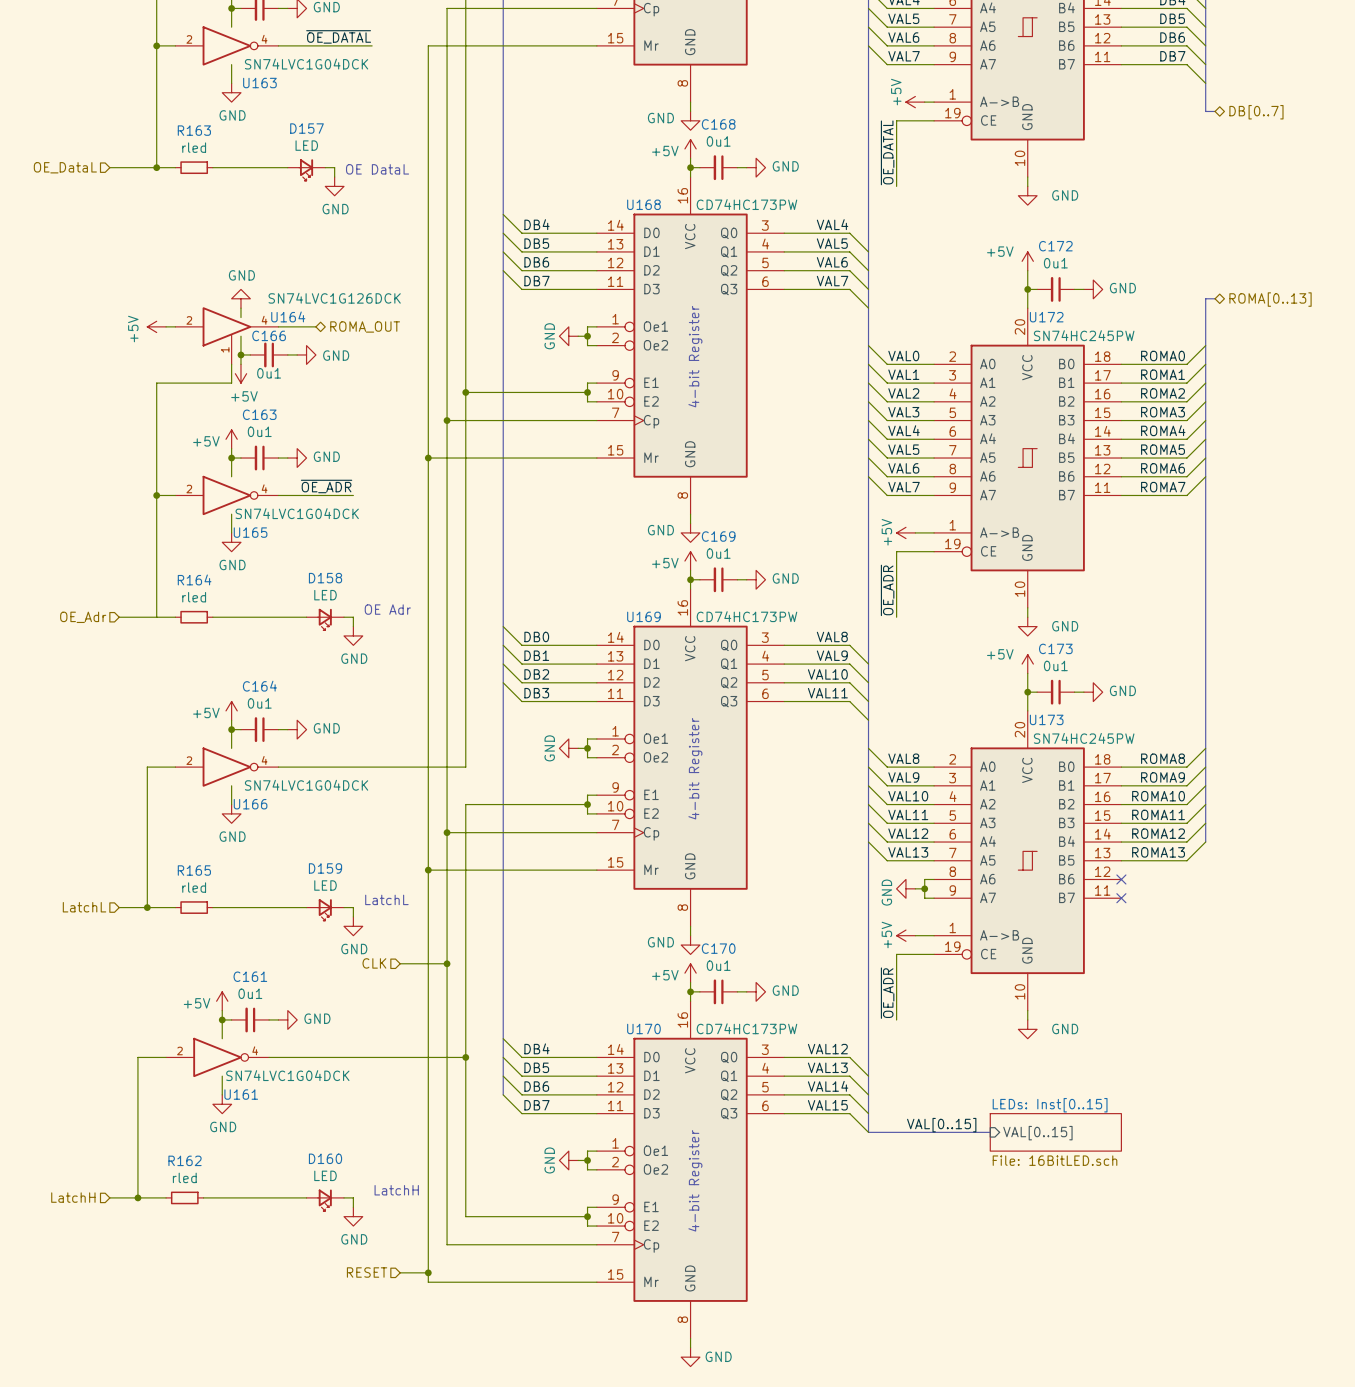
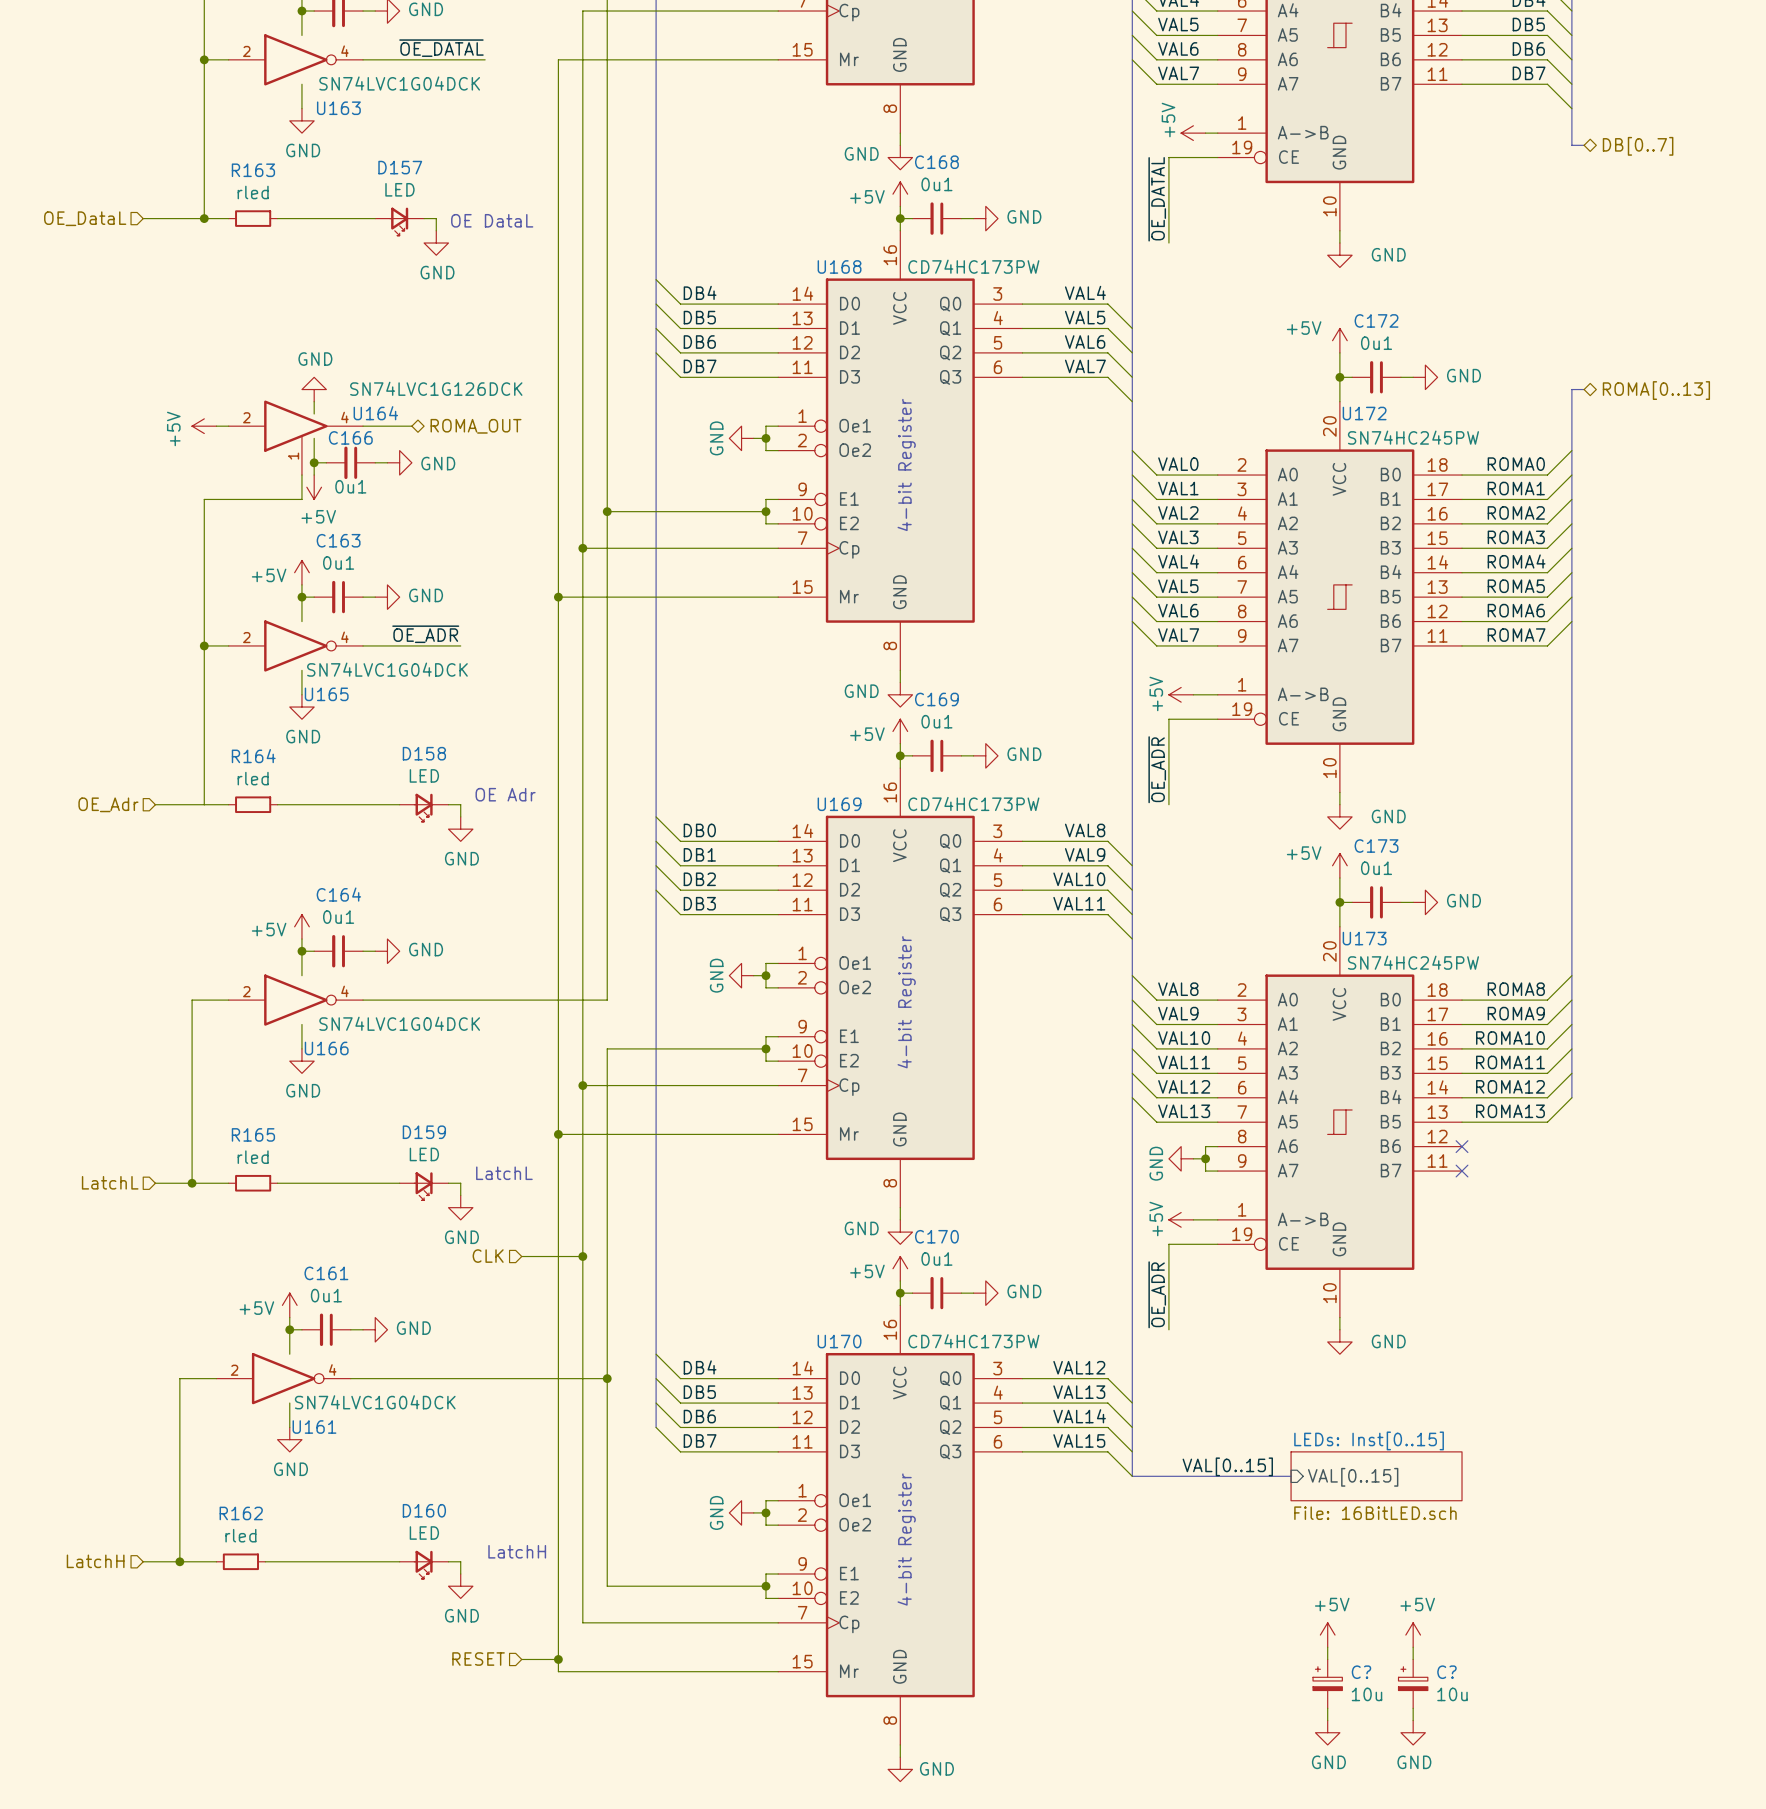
power symbol: none -> +5V (1327, 1635)
power symbol: none -> +5V (1413, 1635)
wire: none -> (1327, 1647) (1327, 1659)
wire: none -> (1413, 1647) (1413, 1659)
C?: none -> 10u (1327, 1683)
C?: none -> 10u (1413, 1683)
wire: none -> (1327, 1708) (1327, 1720)
wire: none -> (1413, 1708) (1413, 1720)
power symbol: none -> GND (1327, 1732)
power symbol: none -> GND (1413, 1732)

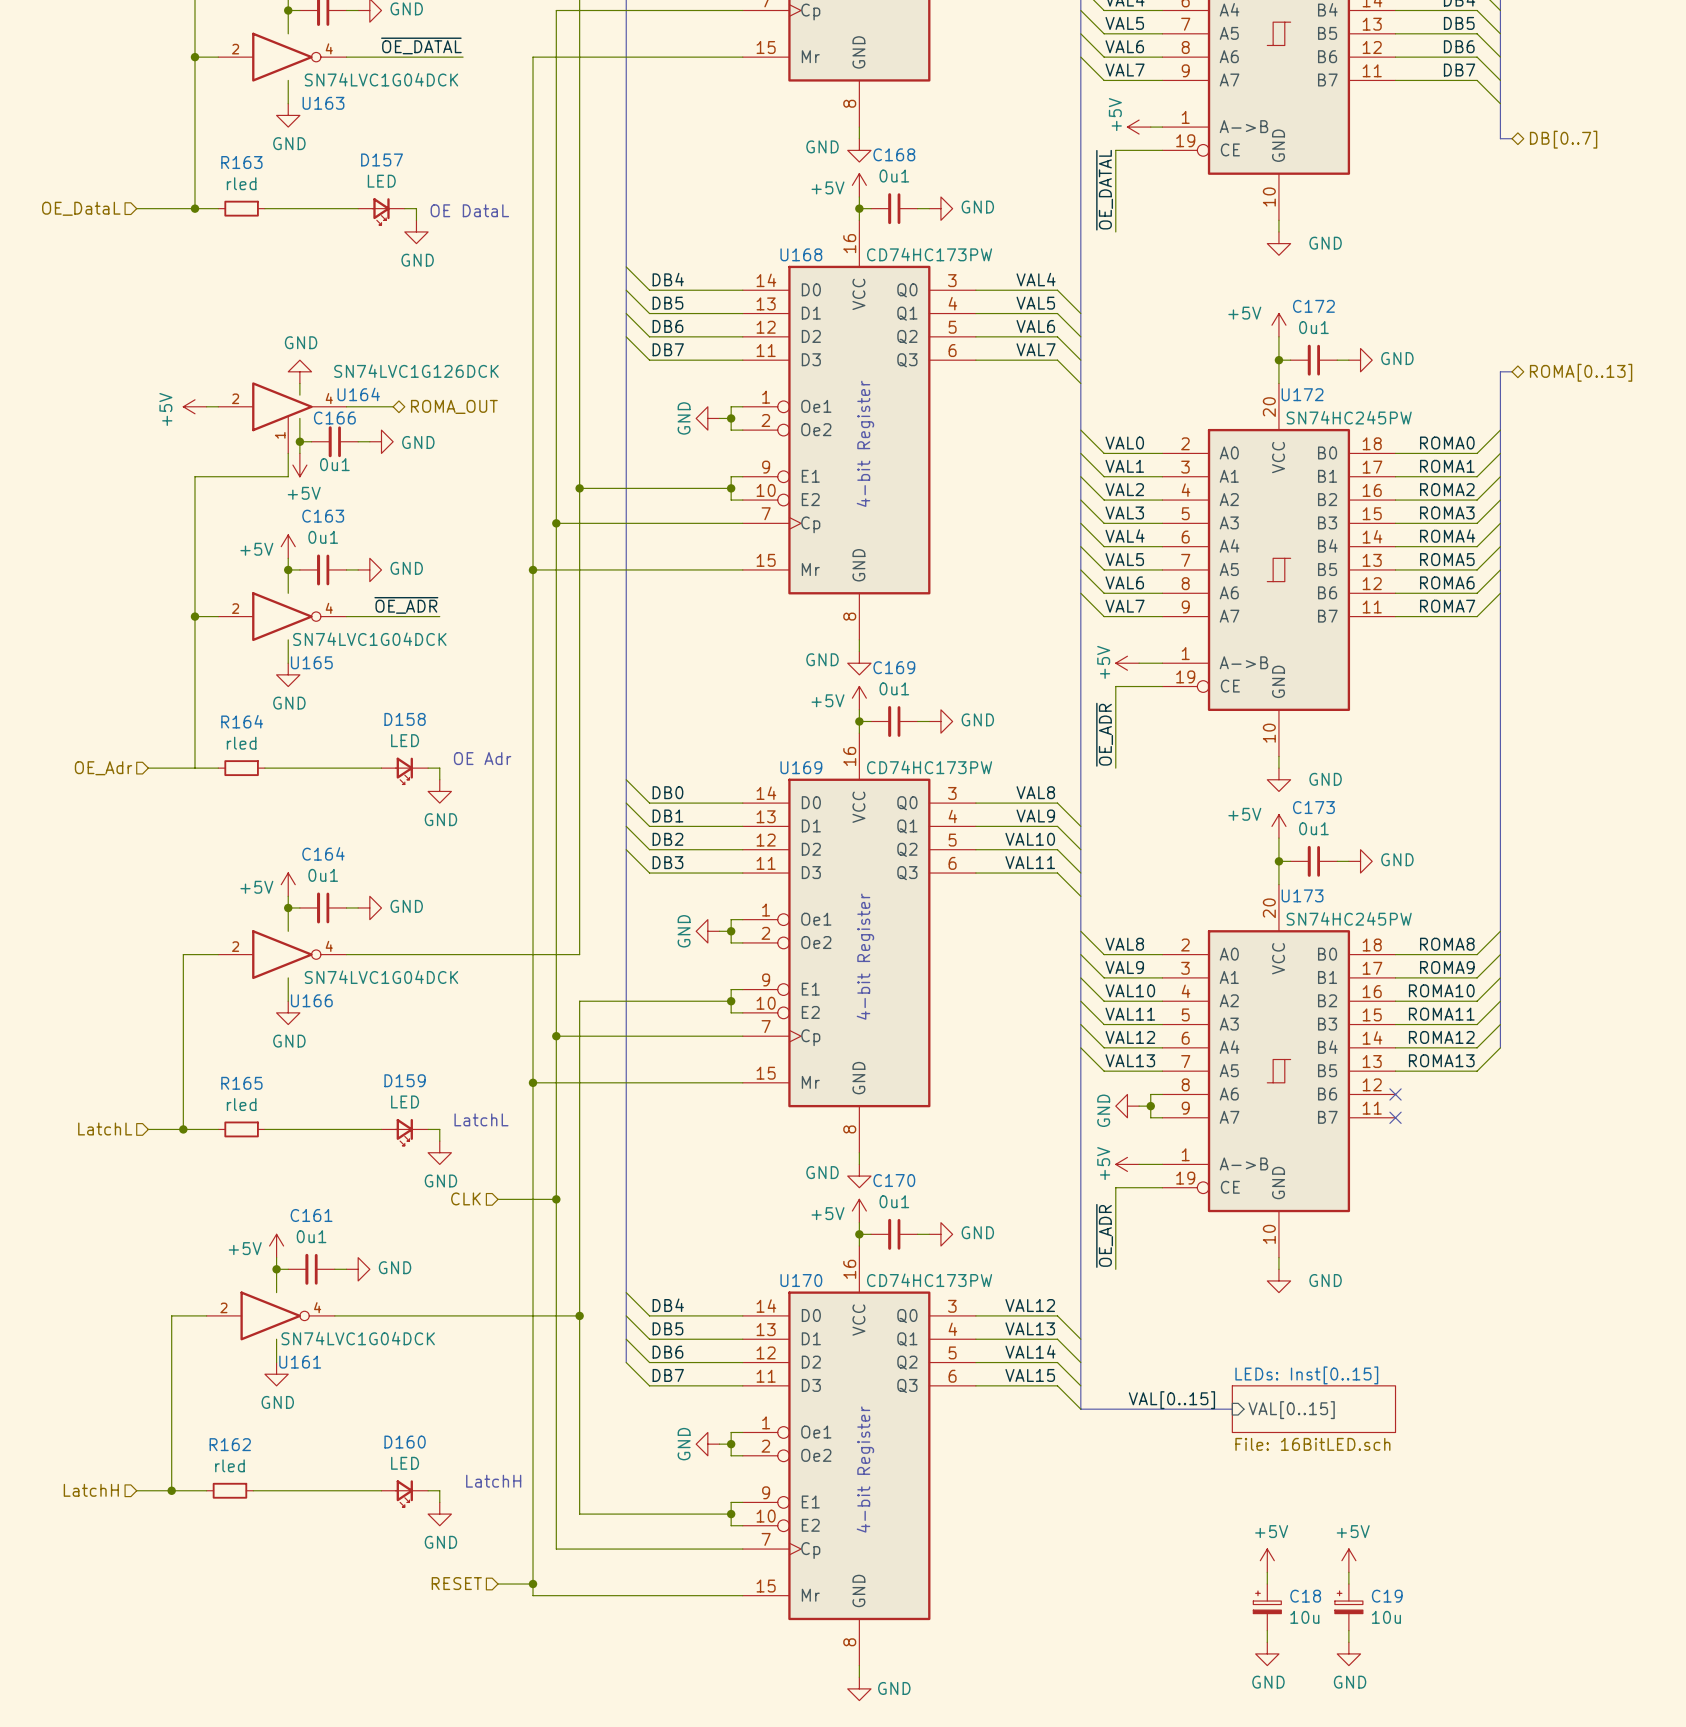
C? name: C? (1361, 1672) -> C18 (1305, 1596)
C? name: C? (1446, 1672) -> C19 (1387, 1596)

